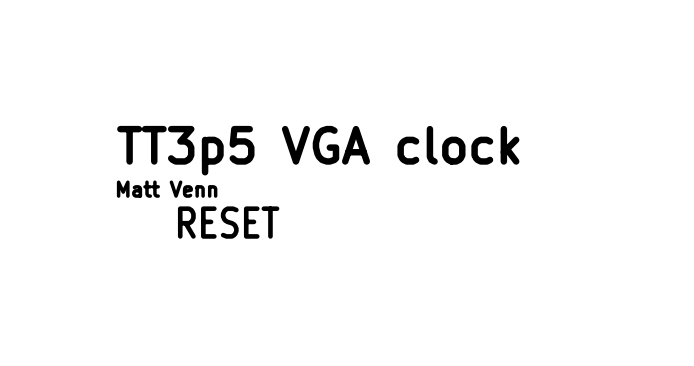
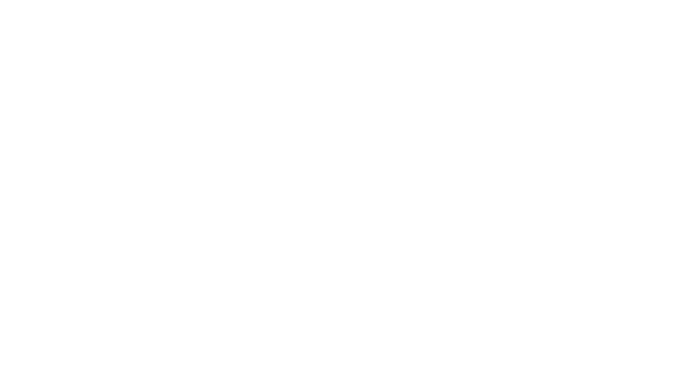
text: TT3p5 VGA clock (318, 150) -> none
text: Matt Venn (167, 189) -> none
text: RESET (228, 222) -> none

